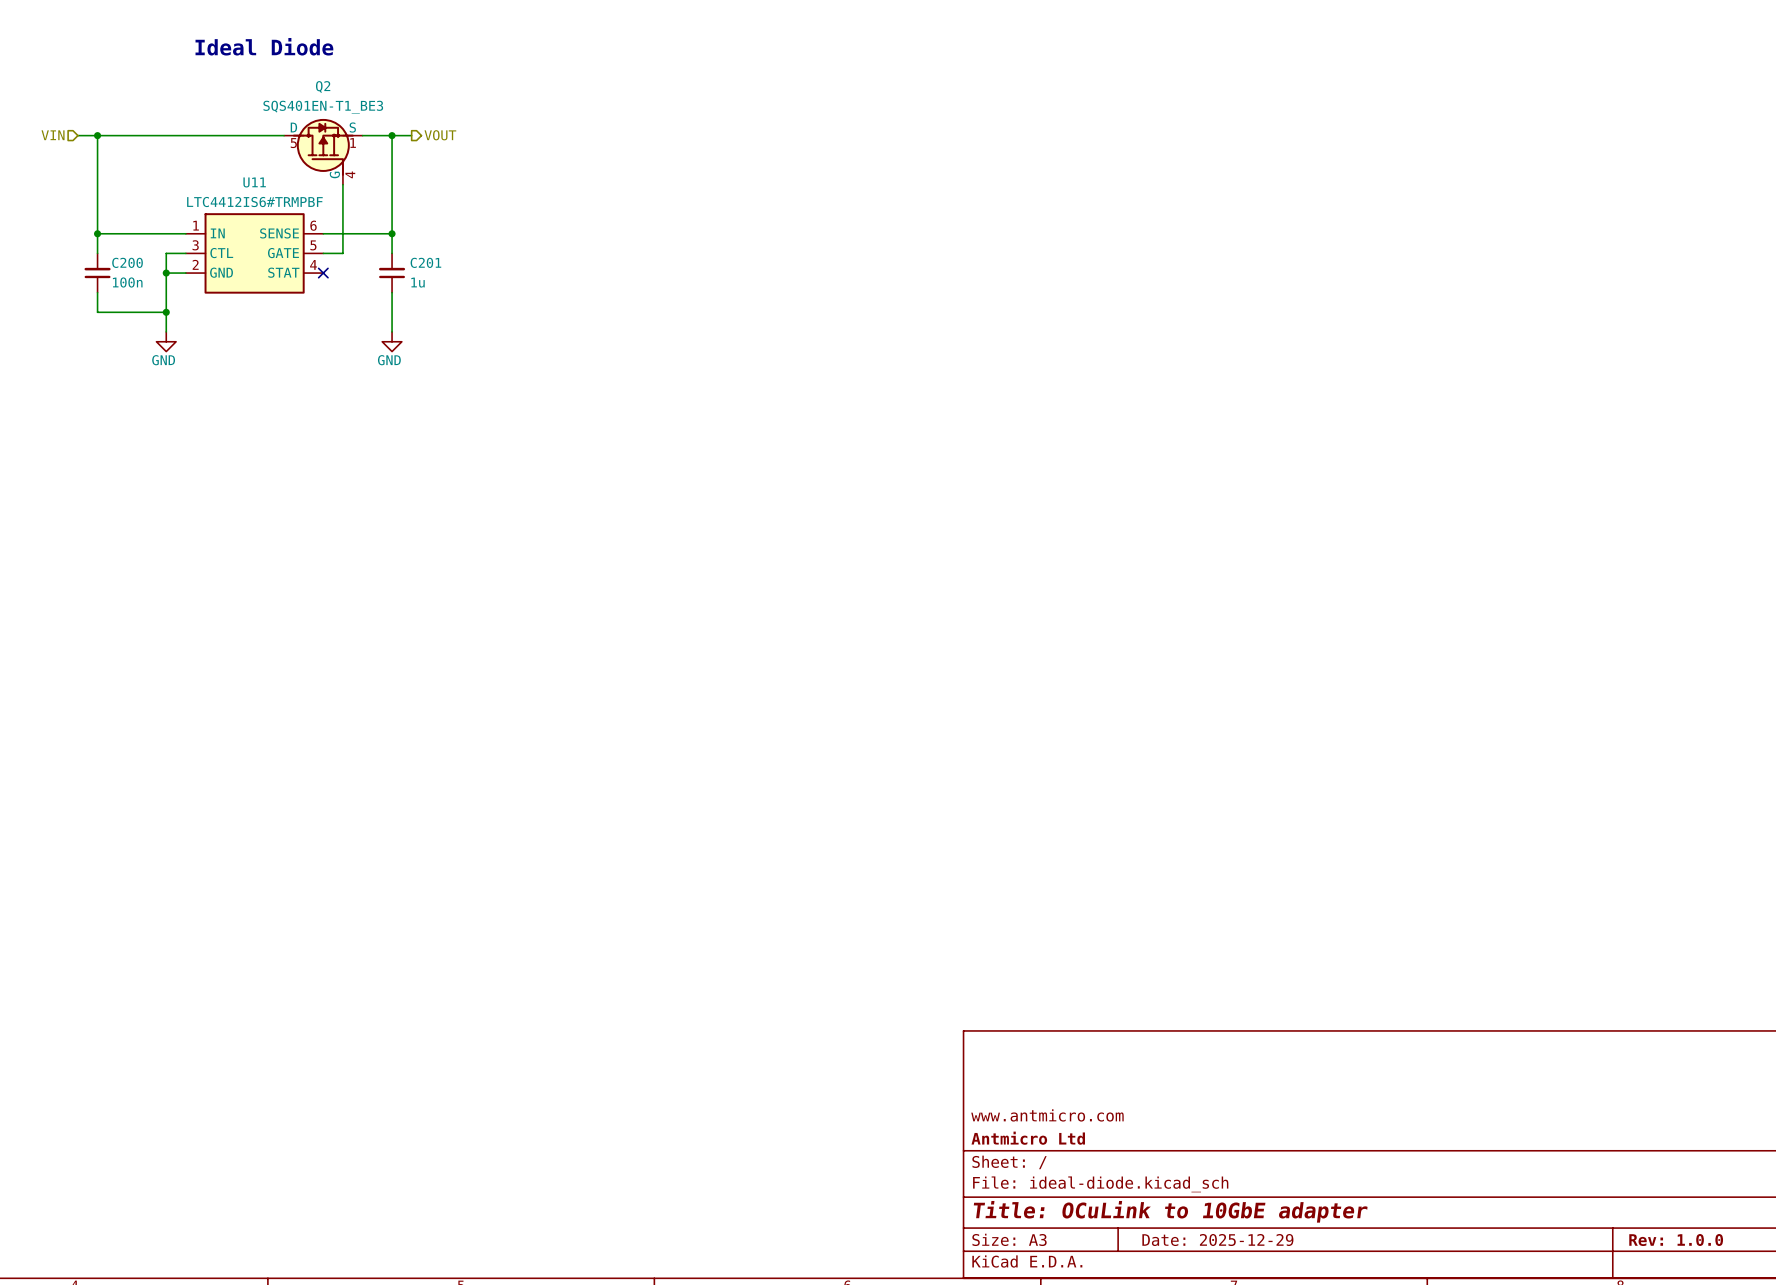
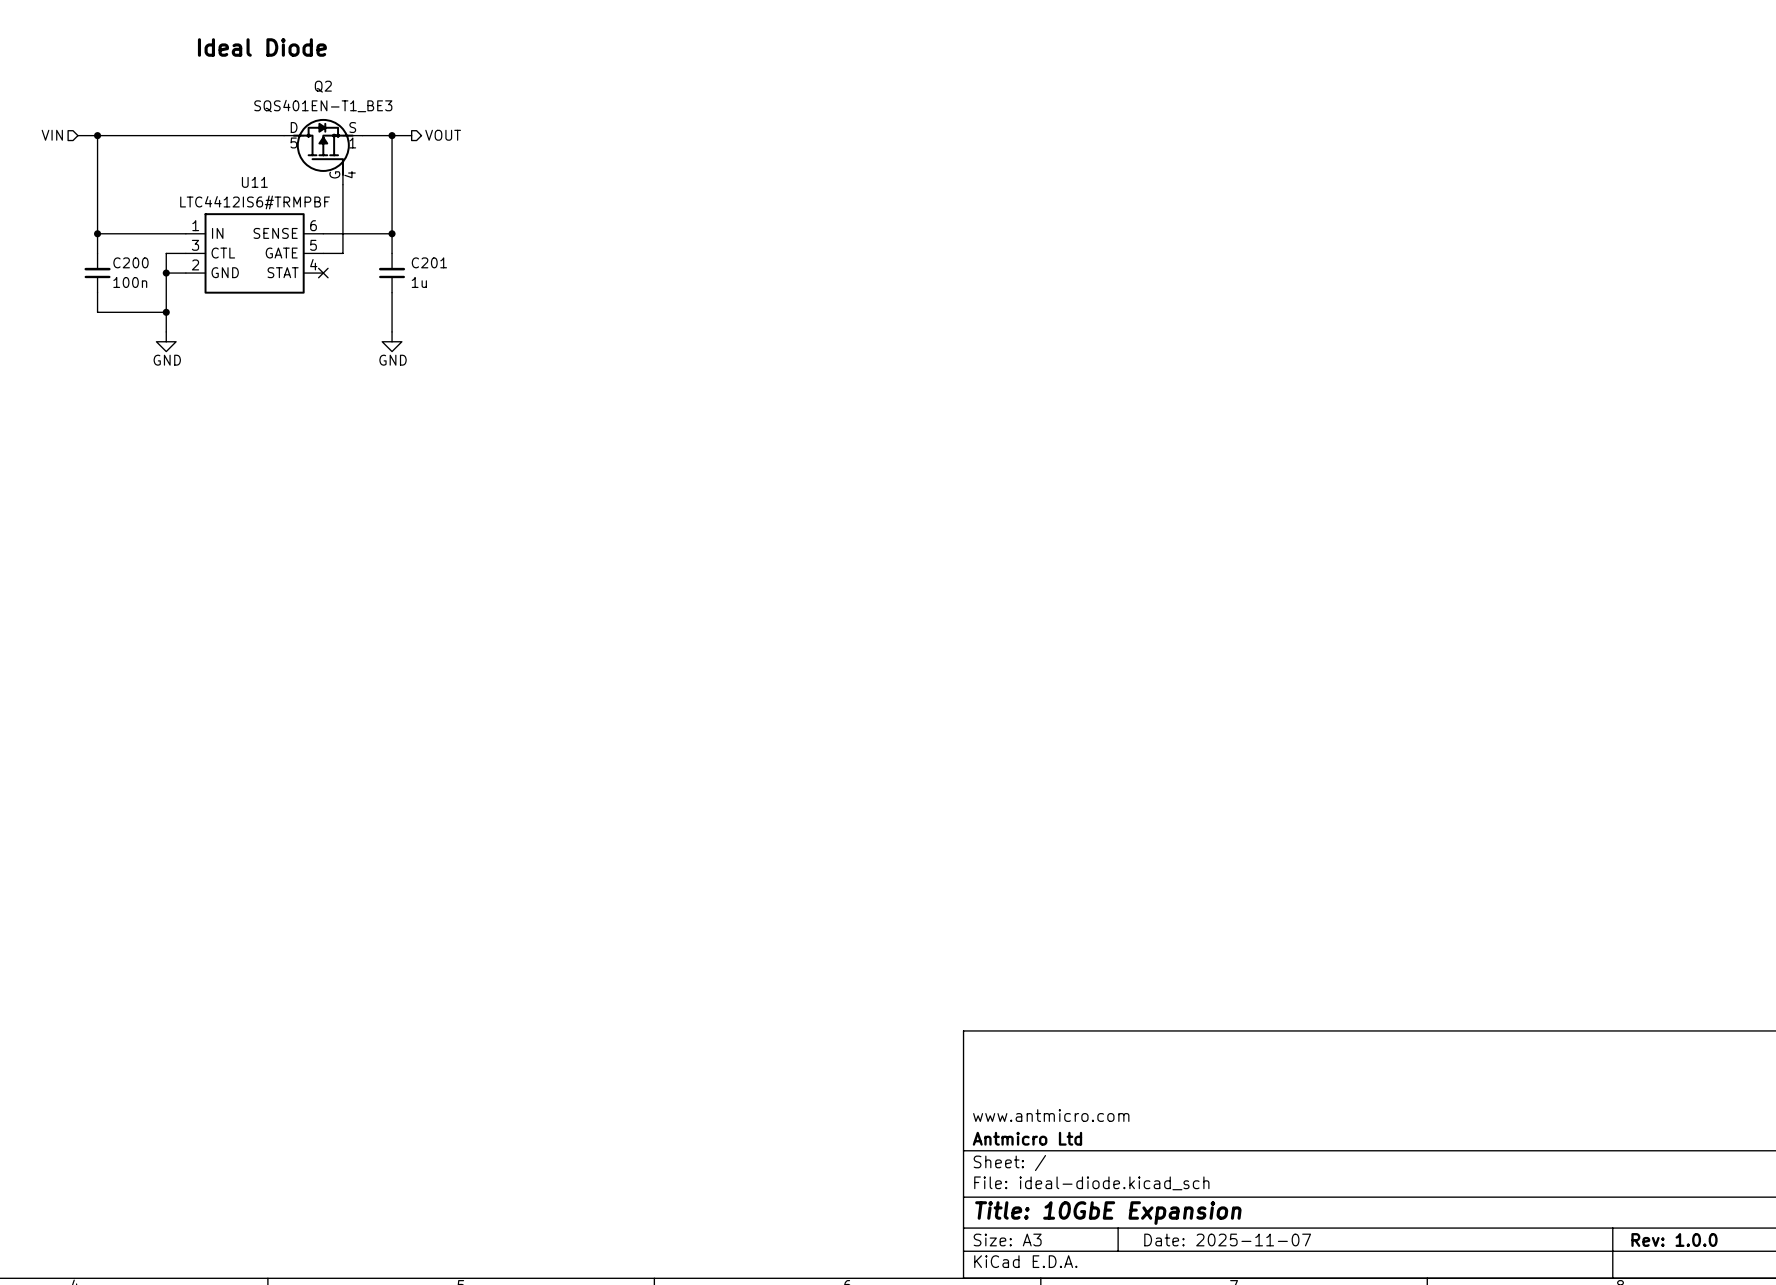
title block: Title: OCuLink to 10GbE adapter (1170, 1211) -> Title: 10GbE Expansion (1108, 1213)
title block: Date: 2025-12-29 (1217, 1240) -> Date: 2025-11-07 (1227, 1240)

